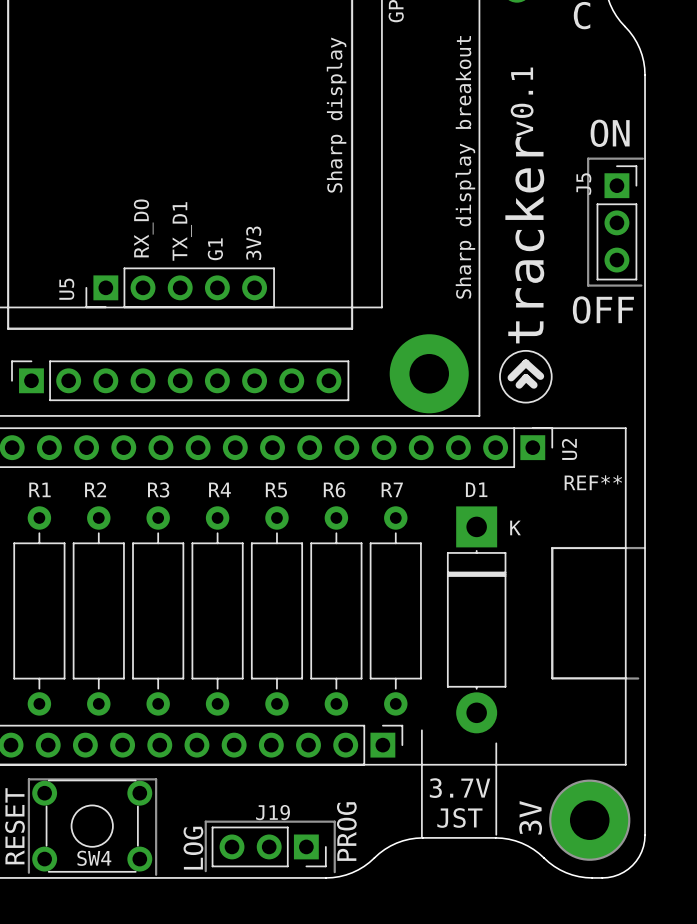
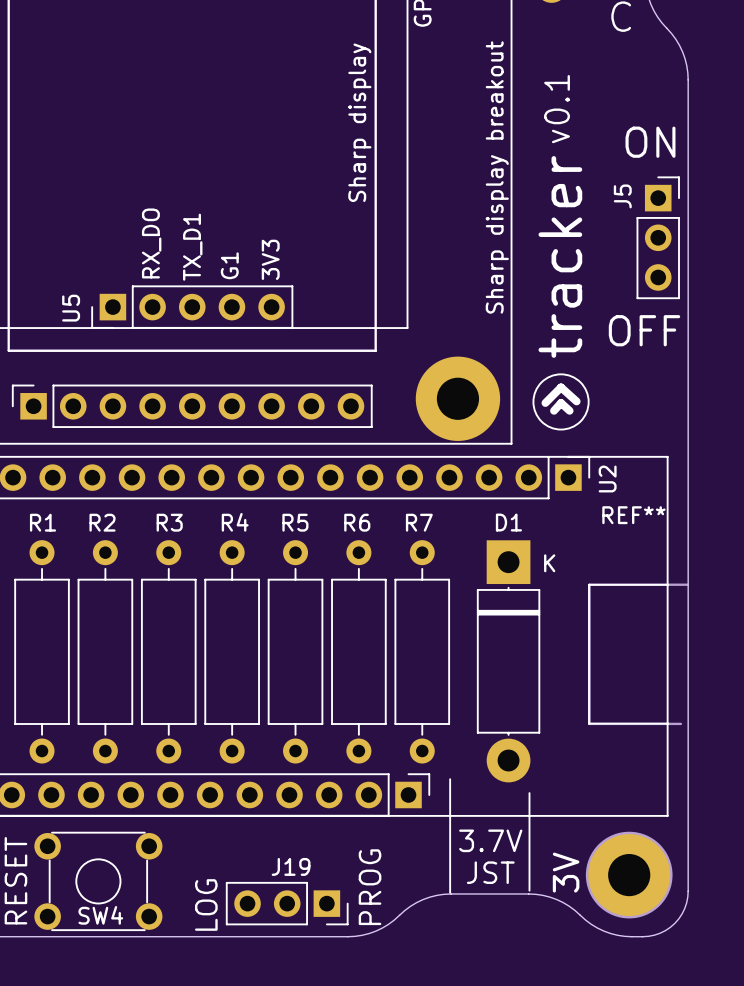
line: (642, 158) (588, 158) (588, 285) (641, 285) -> none
line: (205, 871) (205, 821) (334, 821) (334, 872) -> none
line: (28, 872) (28, 779) (156, 779) (156, 874) -> none

